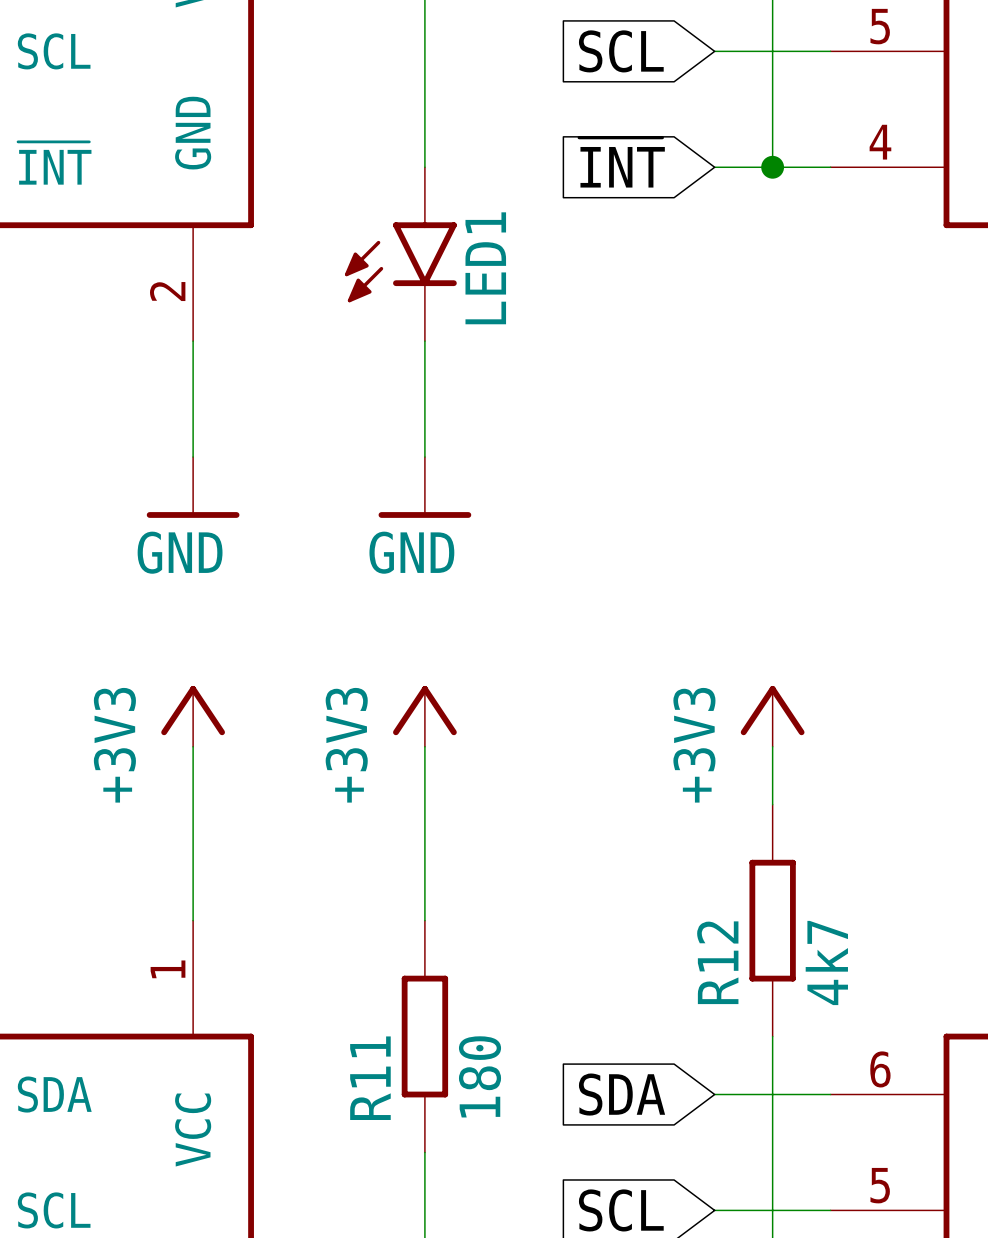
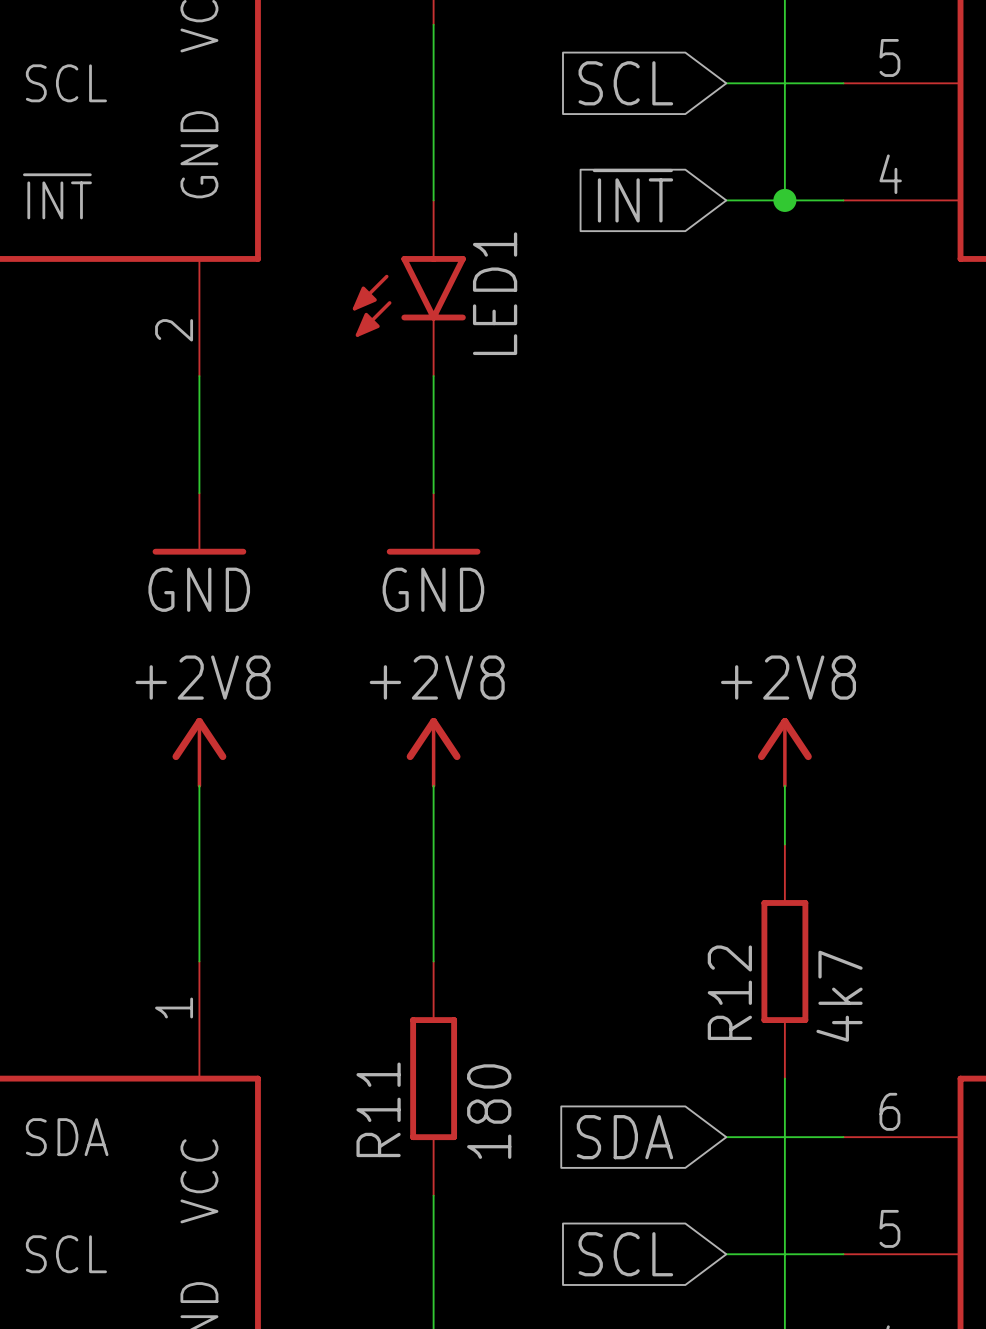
power symbol: +3V3 (193, 716) -> +2V8 (199, 752)
power symbol: +3V3 (424, 716) -> +2V8 (433, 752)
power symbol: +3V3 (772, 716) -> +2V8 (784, 752)

